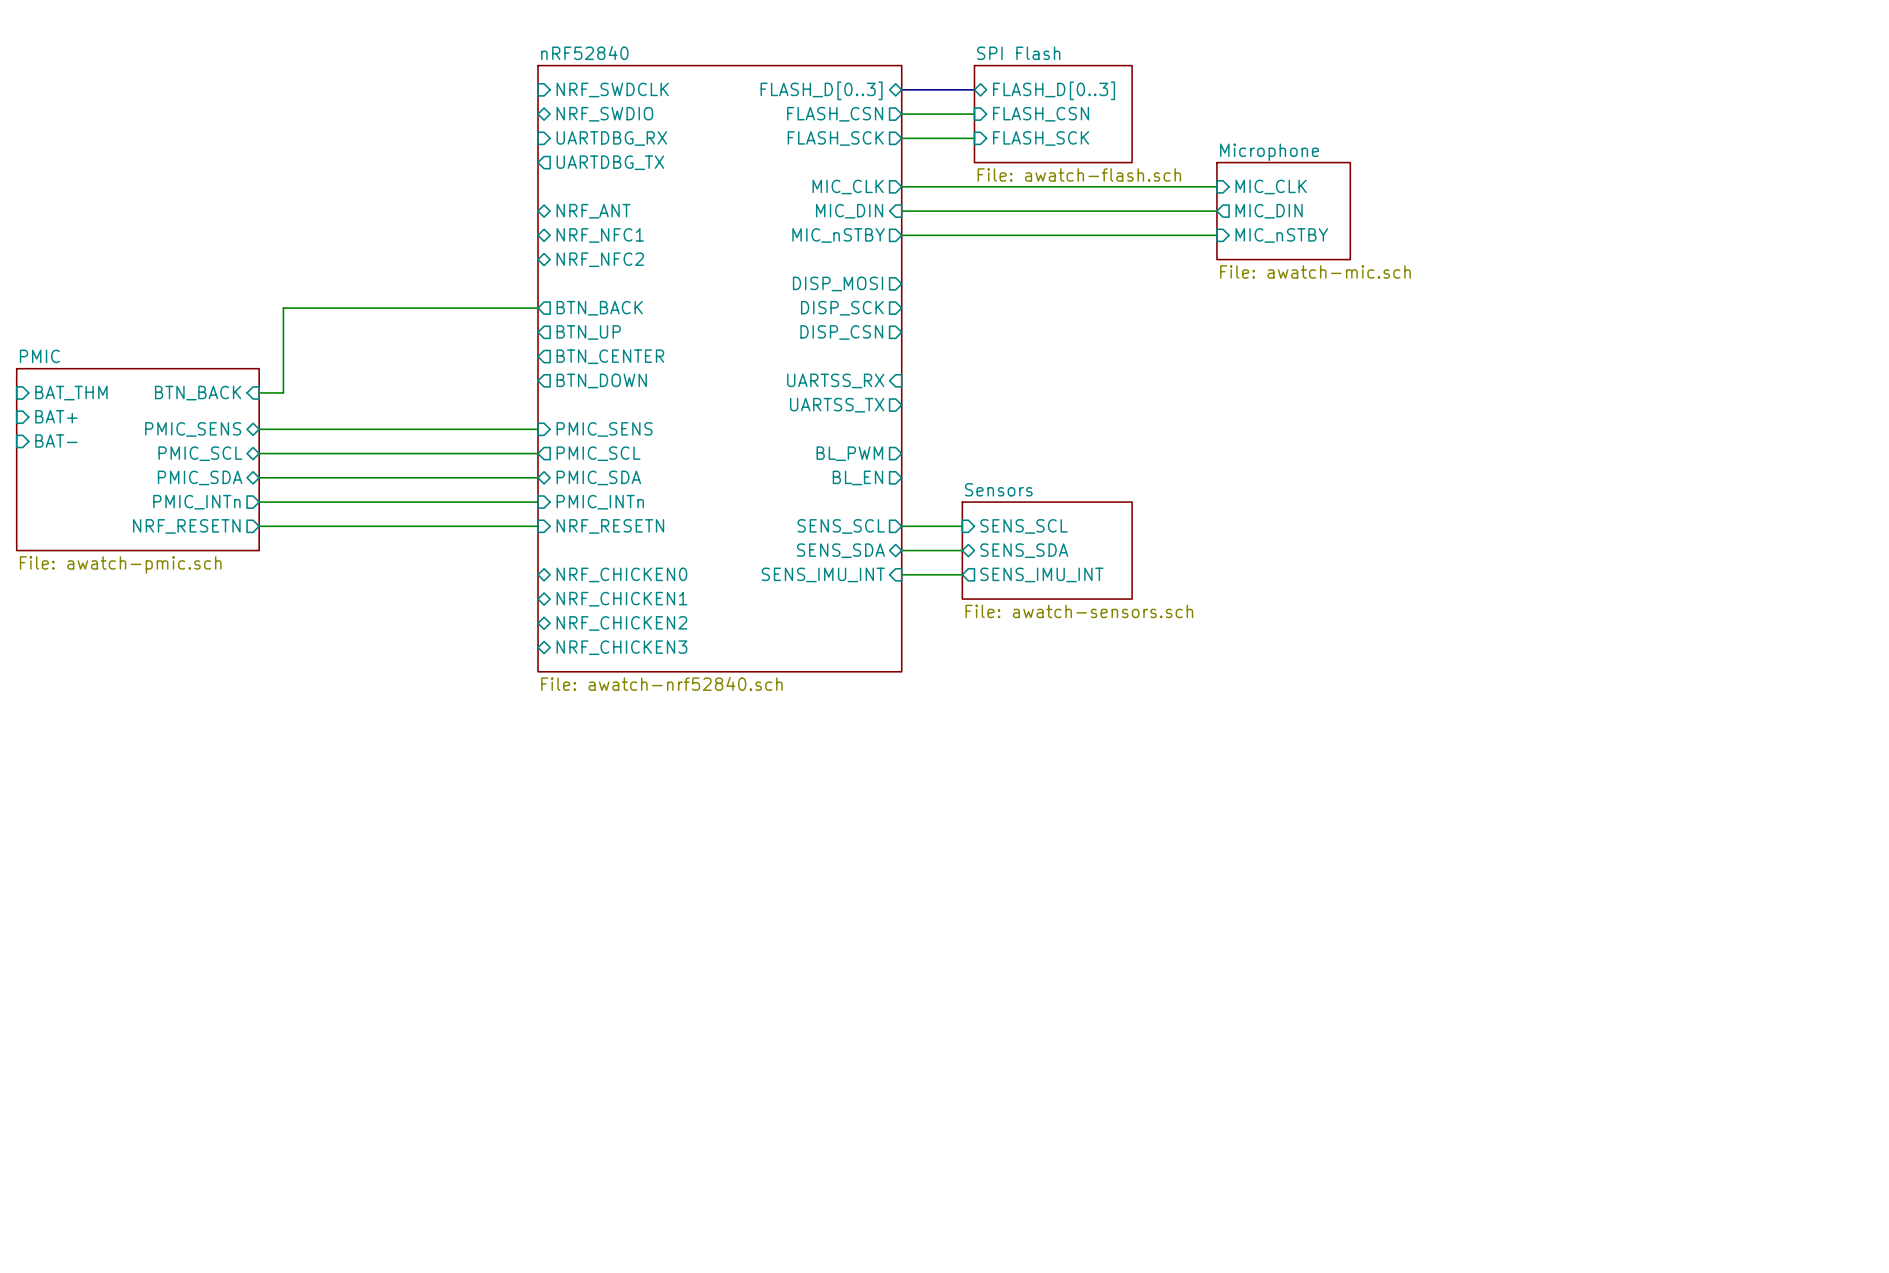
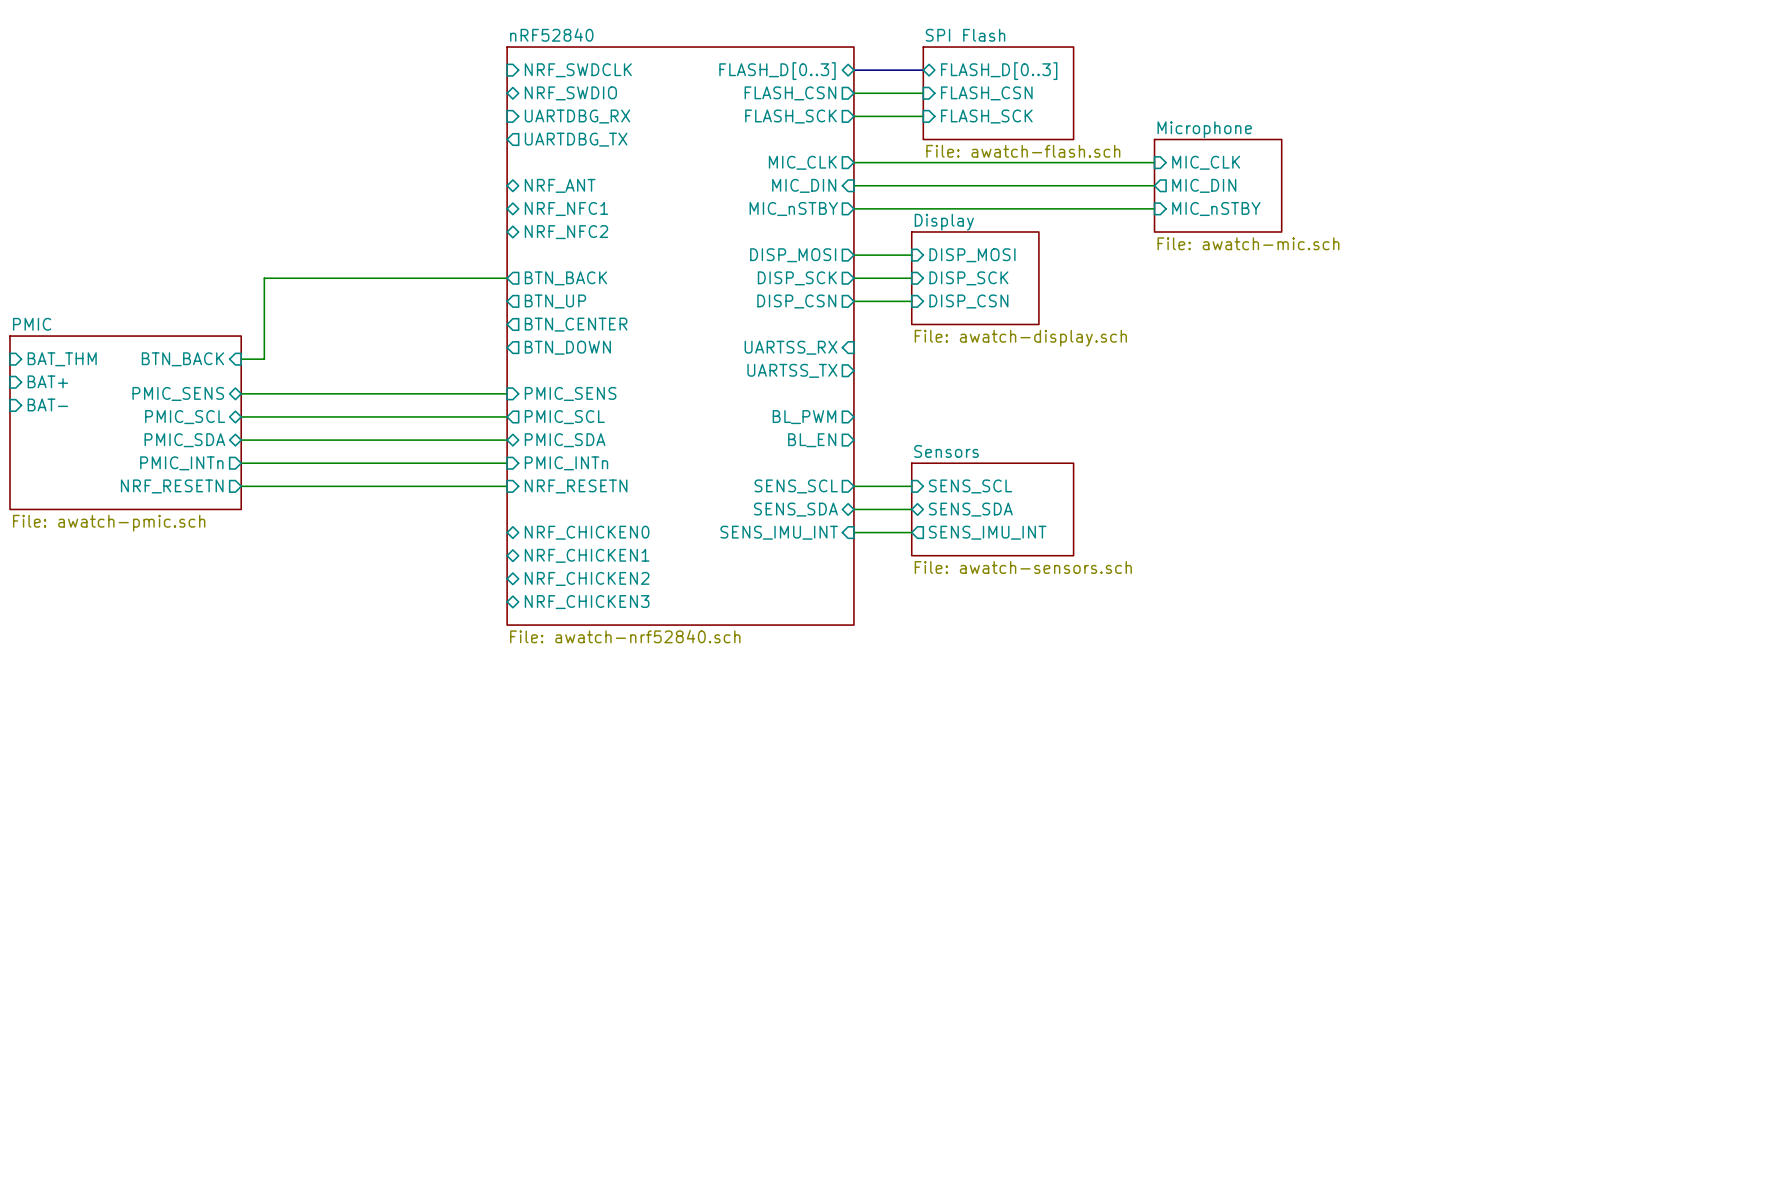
wire: none -> (853, 255) (911, 255)
sheet pin: none -> DISP_MOSI (972, 255)
wire: none -> (853, 278) (911, 278)
sheet pin: none -> DISP_SCK (968, 278)
sheet Display: none -> File: awatch-display.sch (975, 278)
wire: none -> (853, 301) (911, 301)
sheet pin: none -> DISP_CSN (968, 301)

